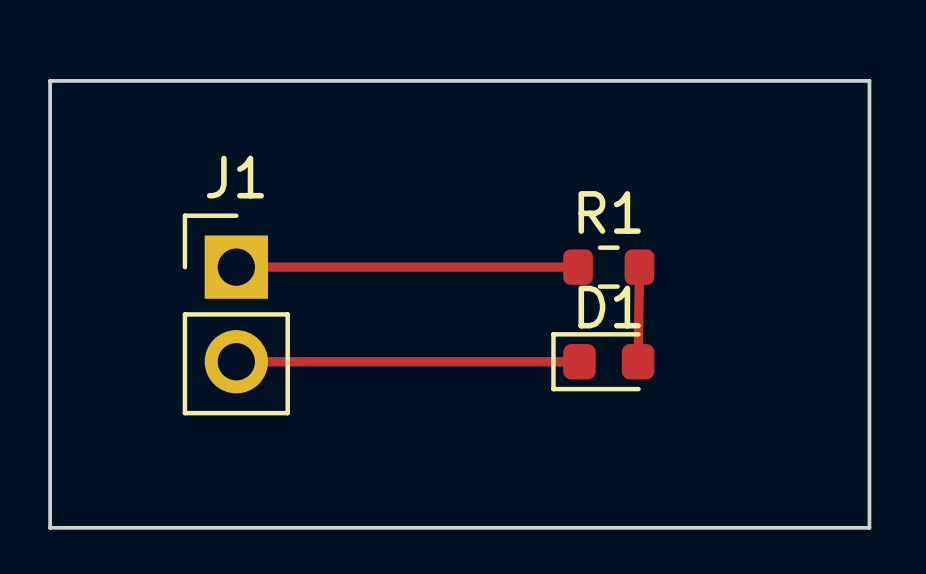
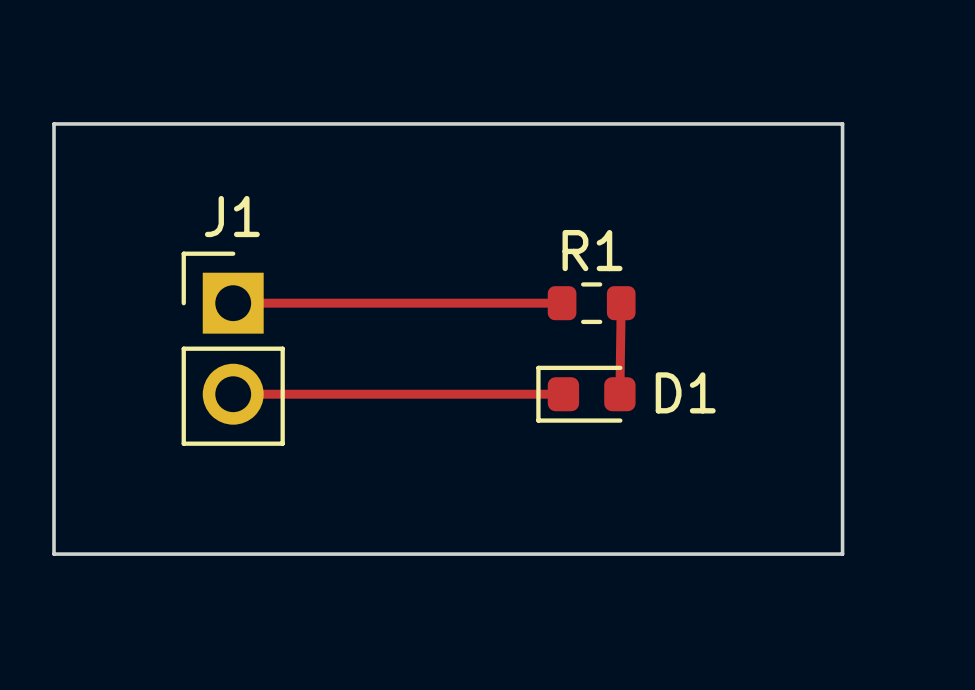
D1 name position: D1 (609, 307) -> D1 (685, 392)

